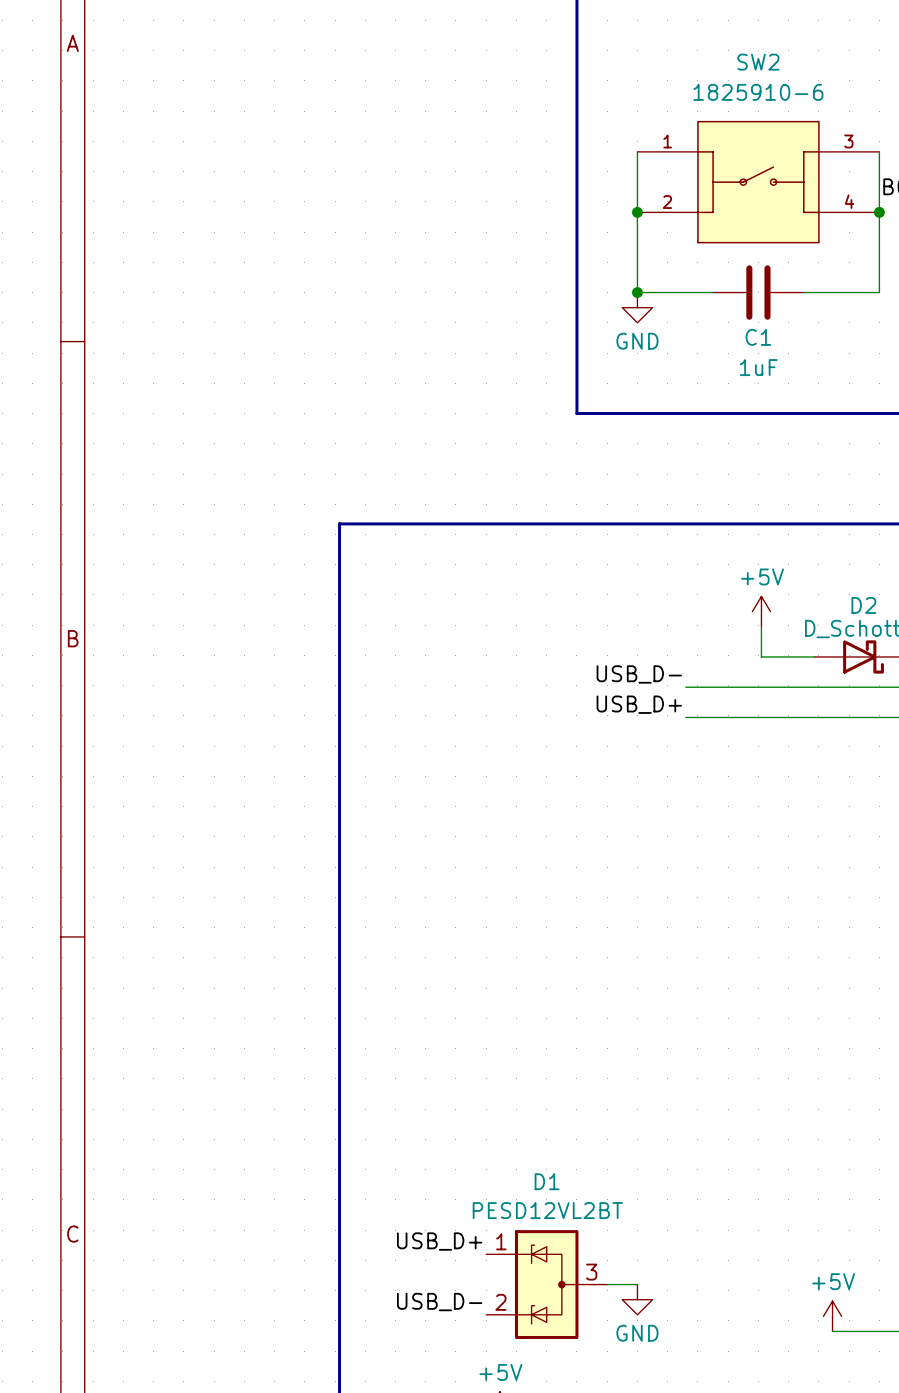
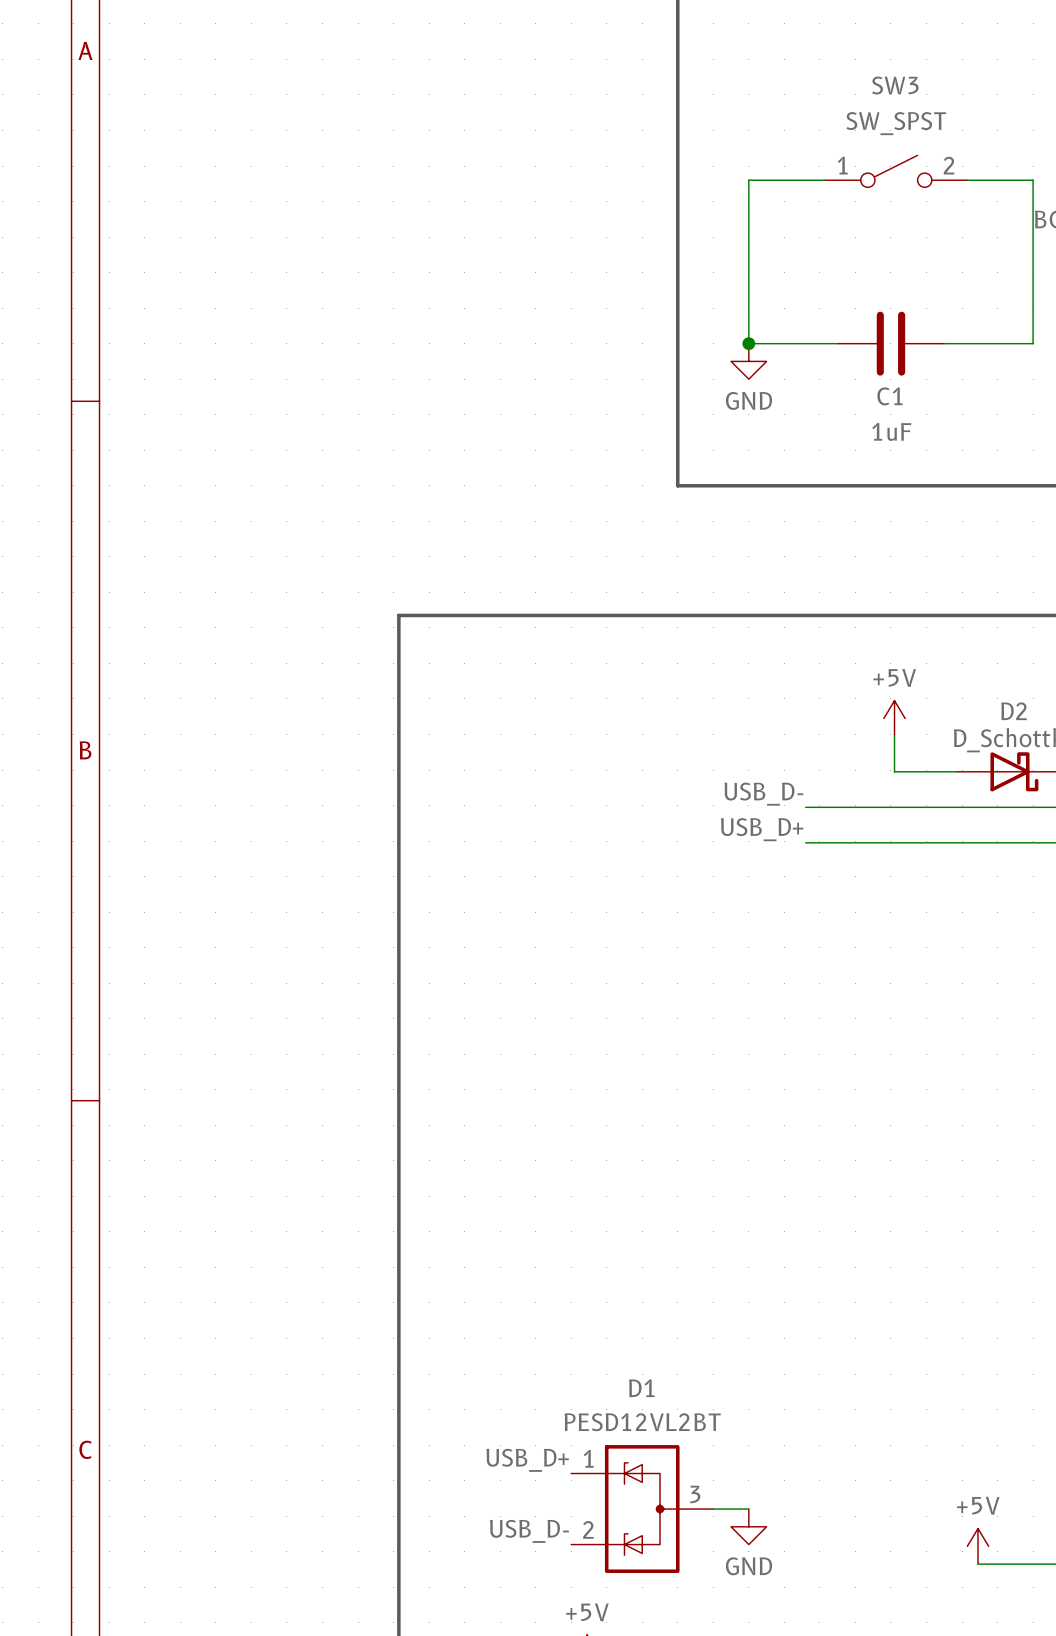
SW3: none -> SW_SPST (896, 171)
wire: (637, 151) (637, 153) -> (825, 180) (748, 180)
wire: (879, 151) (879, 153) -> (967, 180) (1033, 180)
SW2: 1825910-6 (758, 182) -> none
junction: (637, 212) -> none
junction: (879, 212) -> none

